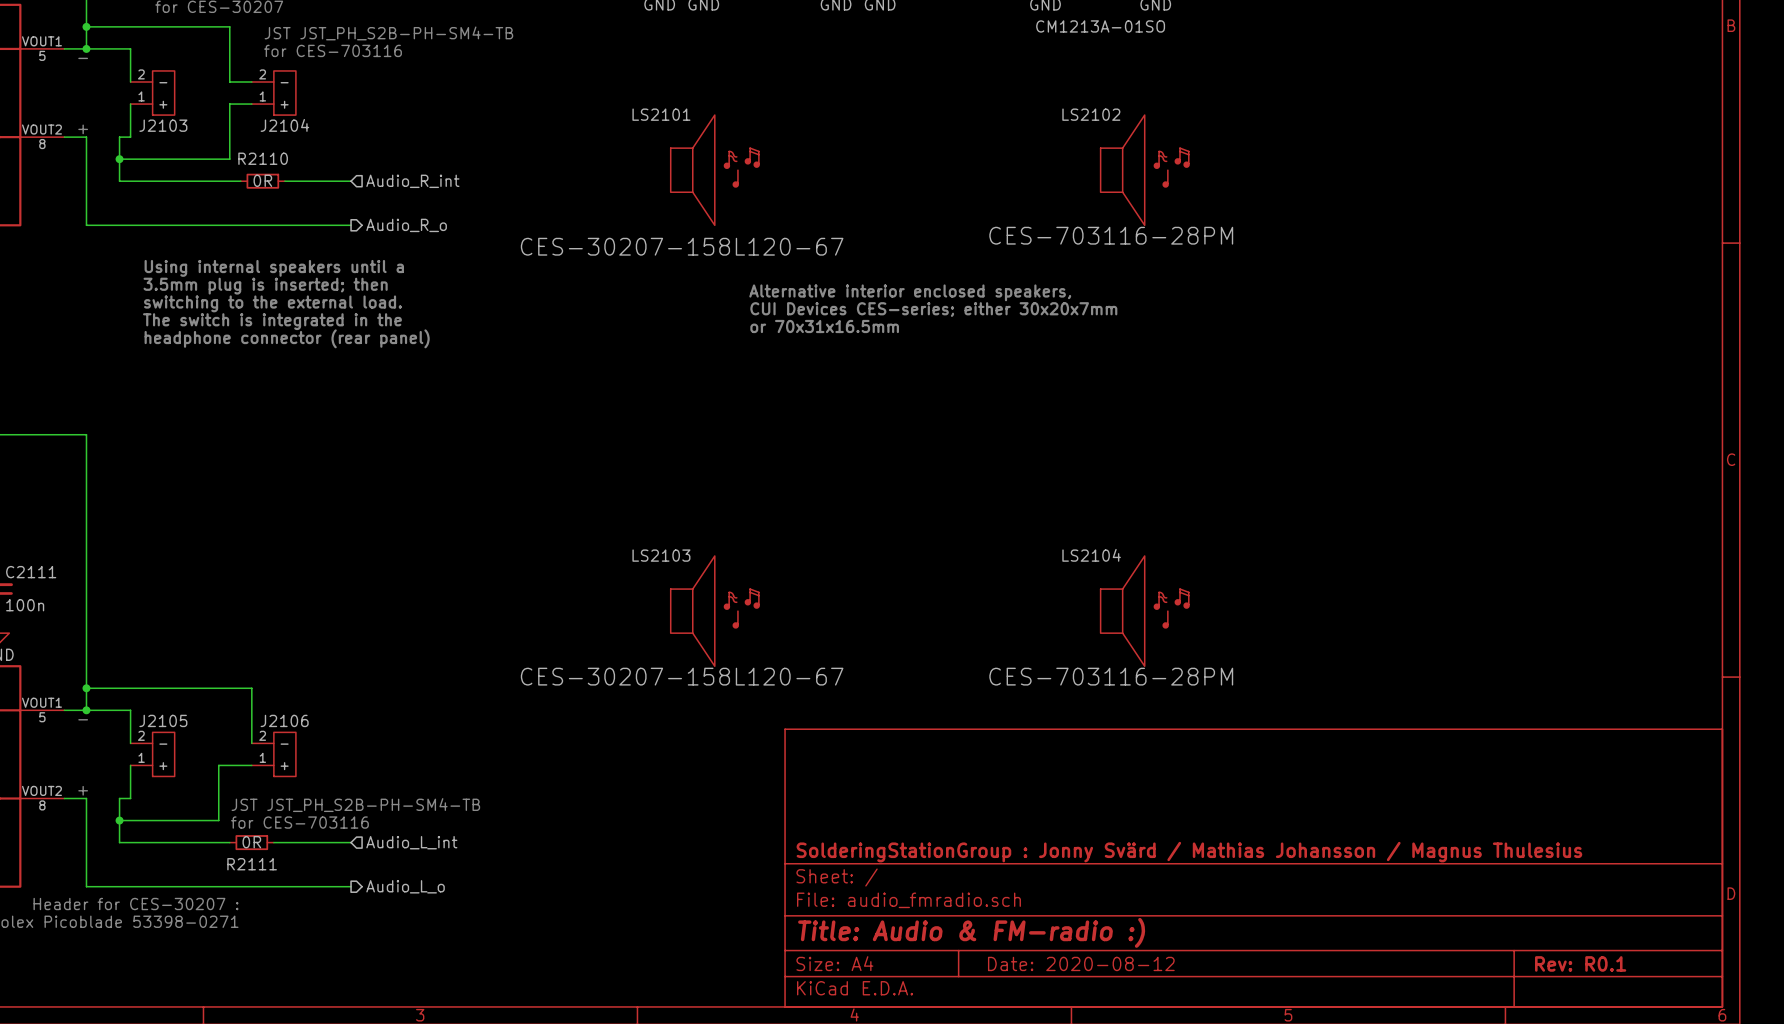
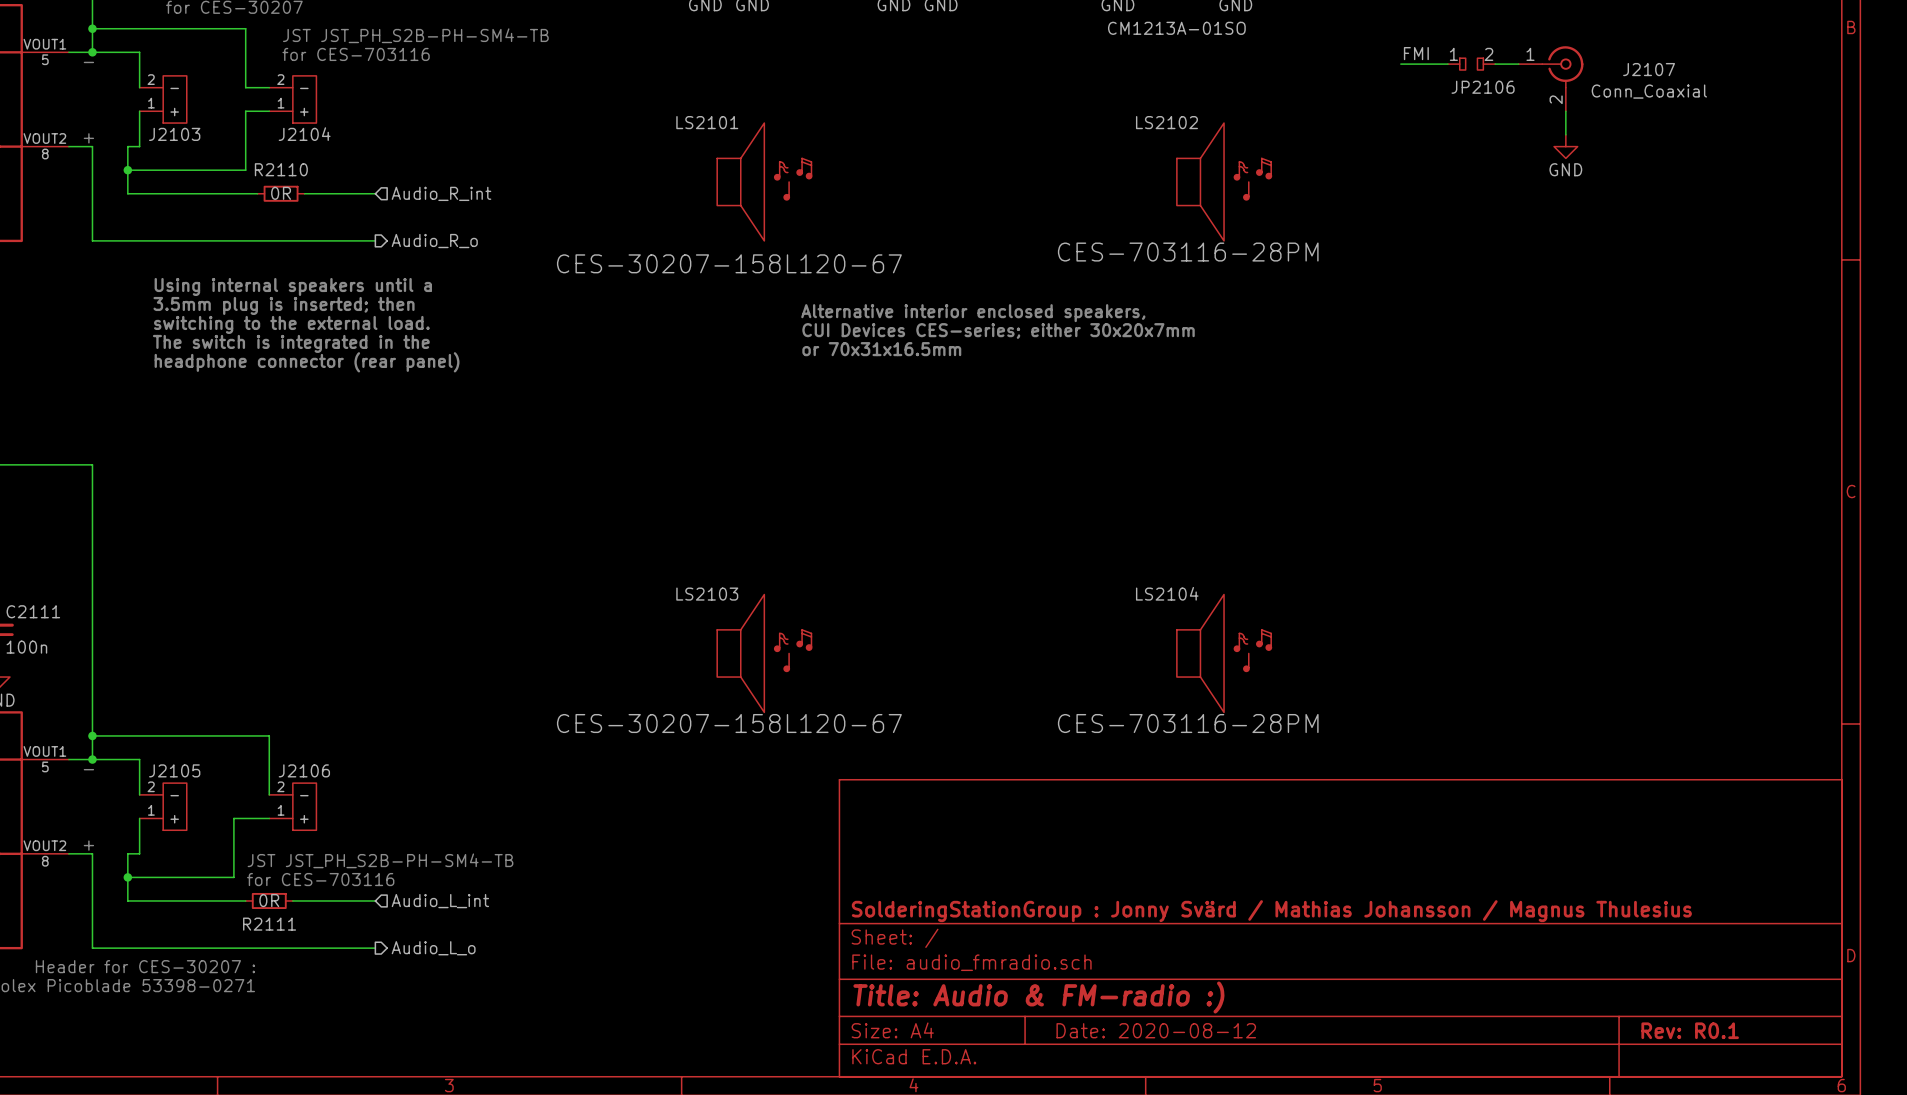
label: none -> FMI (1416, 53)
wire: none -> (1400, 64) (1447, 64)
JP2106: none -> (1471, 64)
wire: none -> (1495, 64) (1518, 64)
J2107: none -> Conn_Coaxial (1551, 78)
wire: none -> (1565, 111) (1565, 134)
power symbol: none -> GND (1565, 146)

